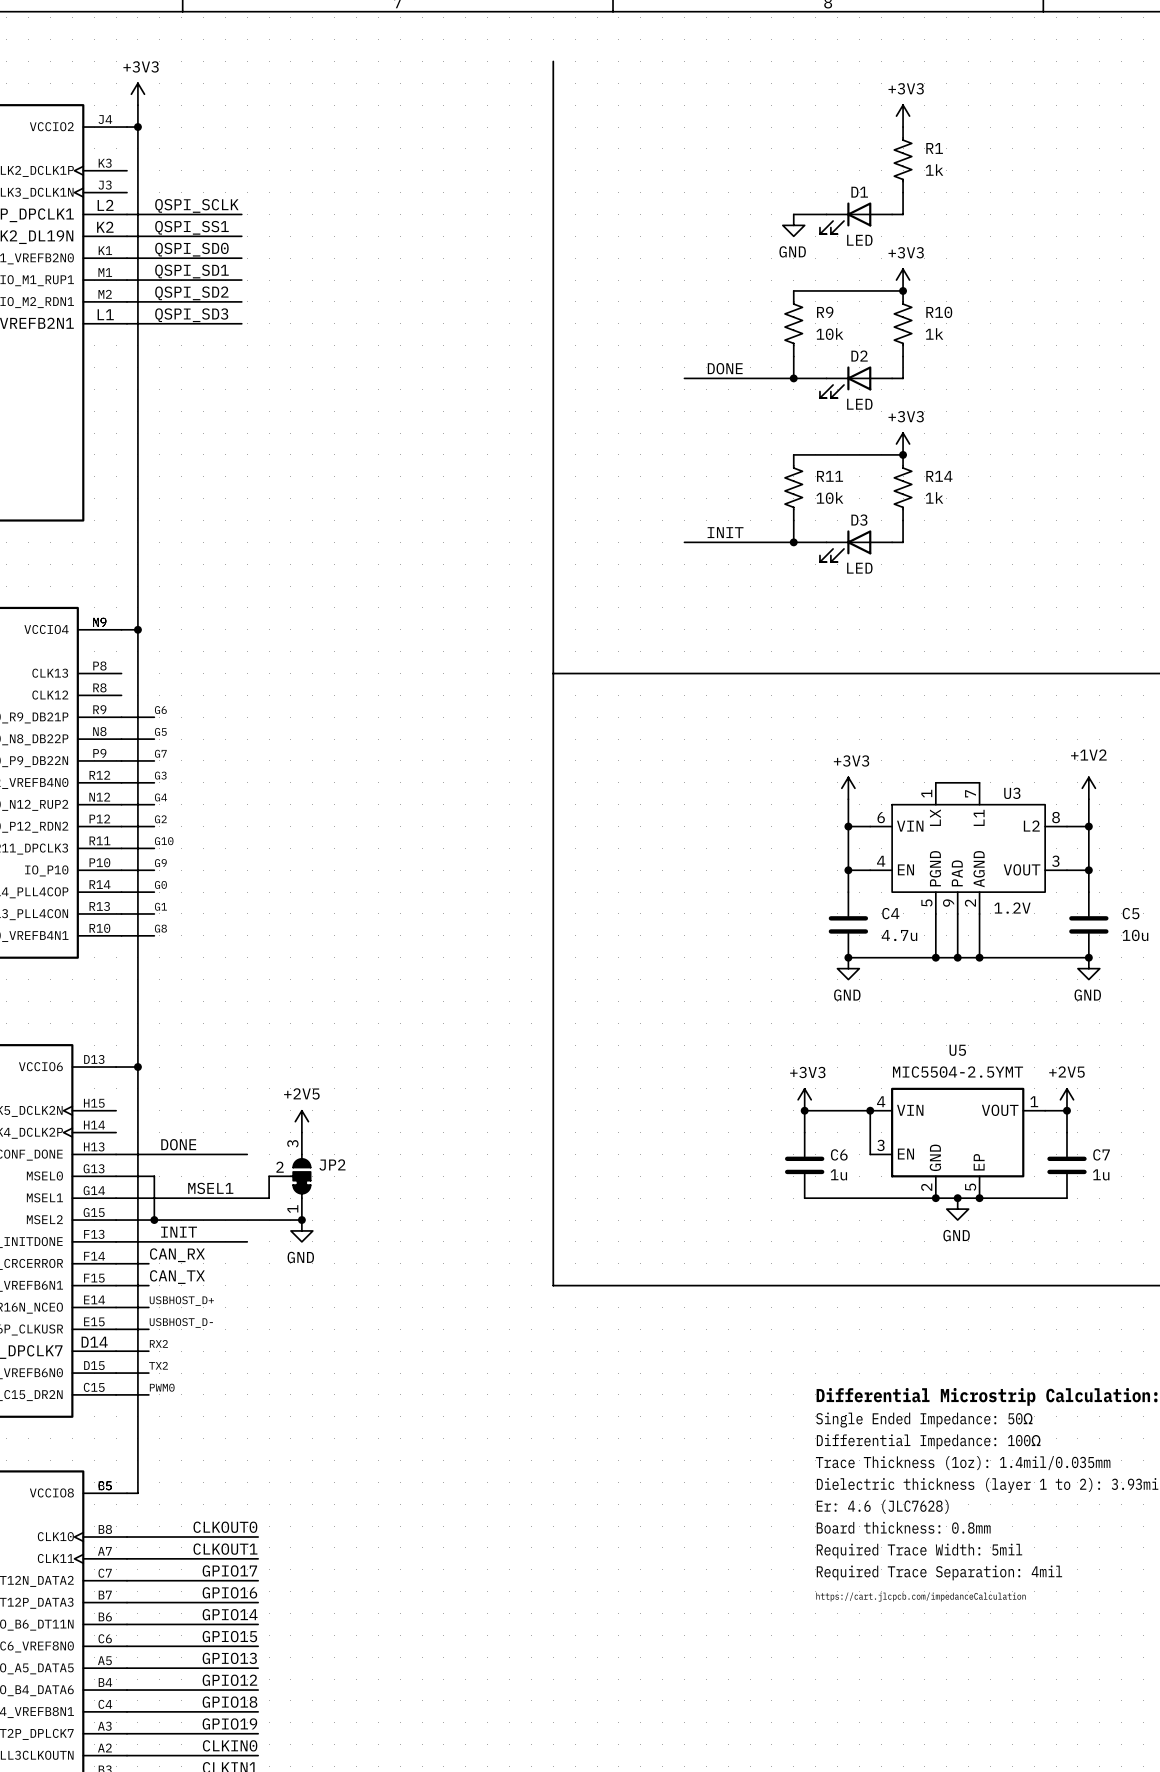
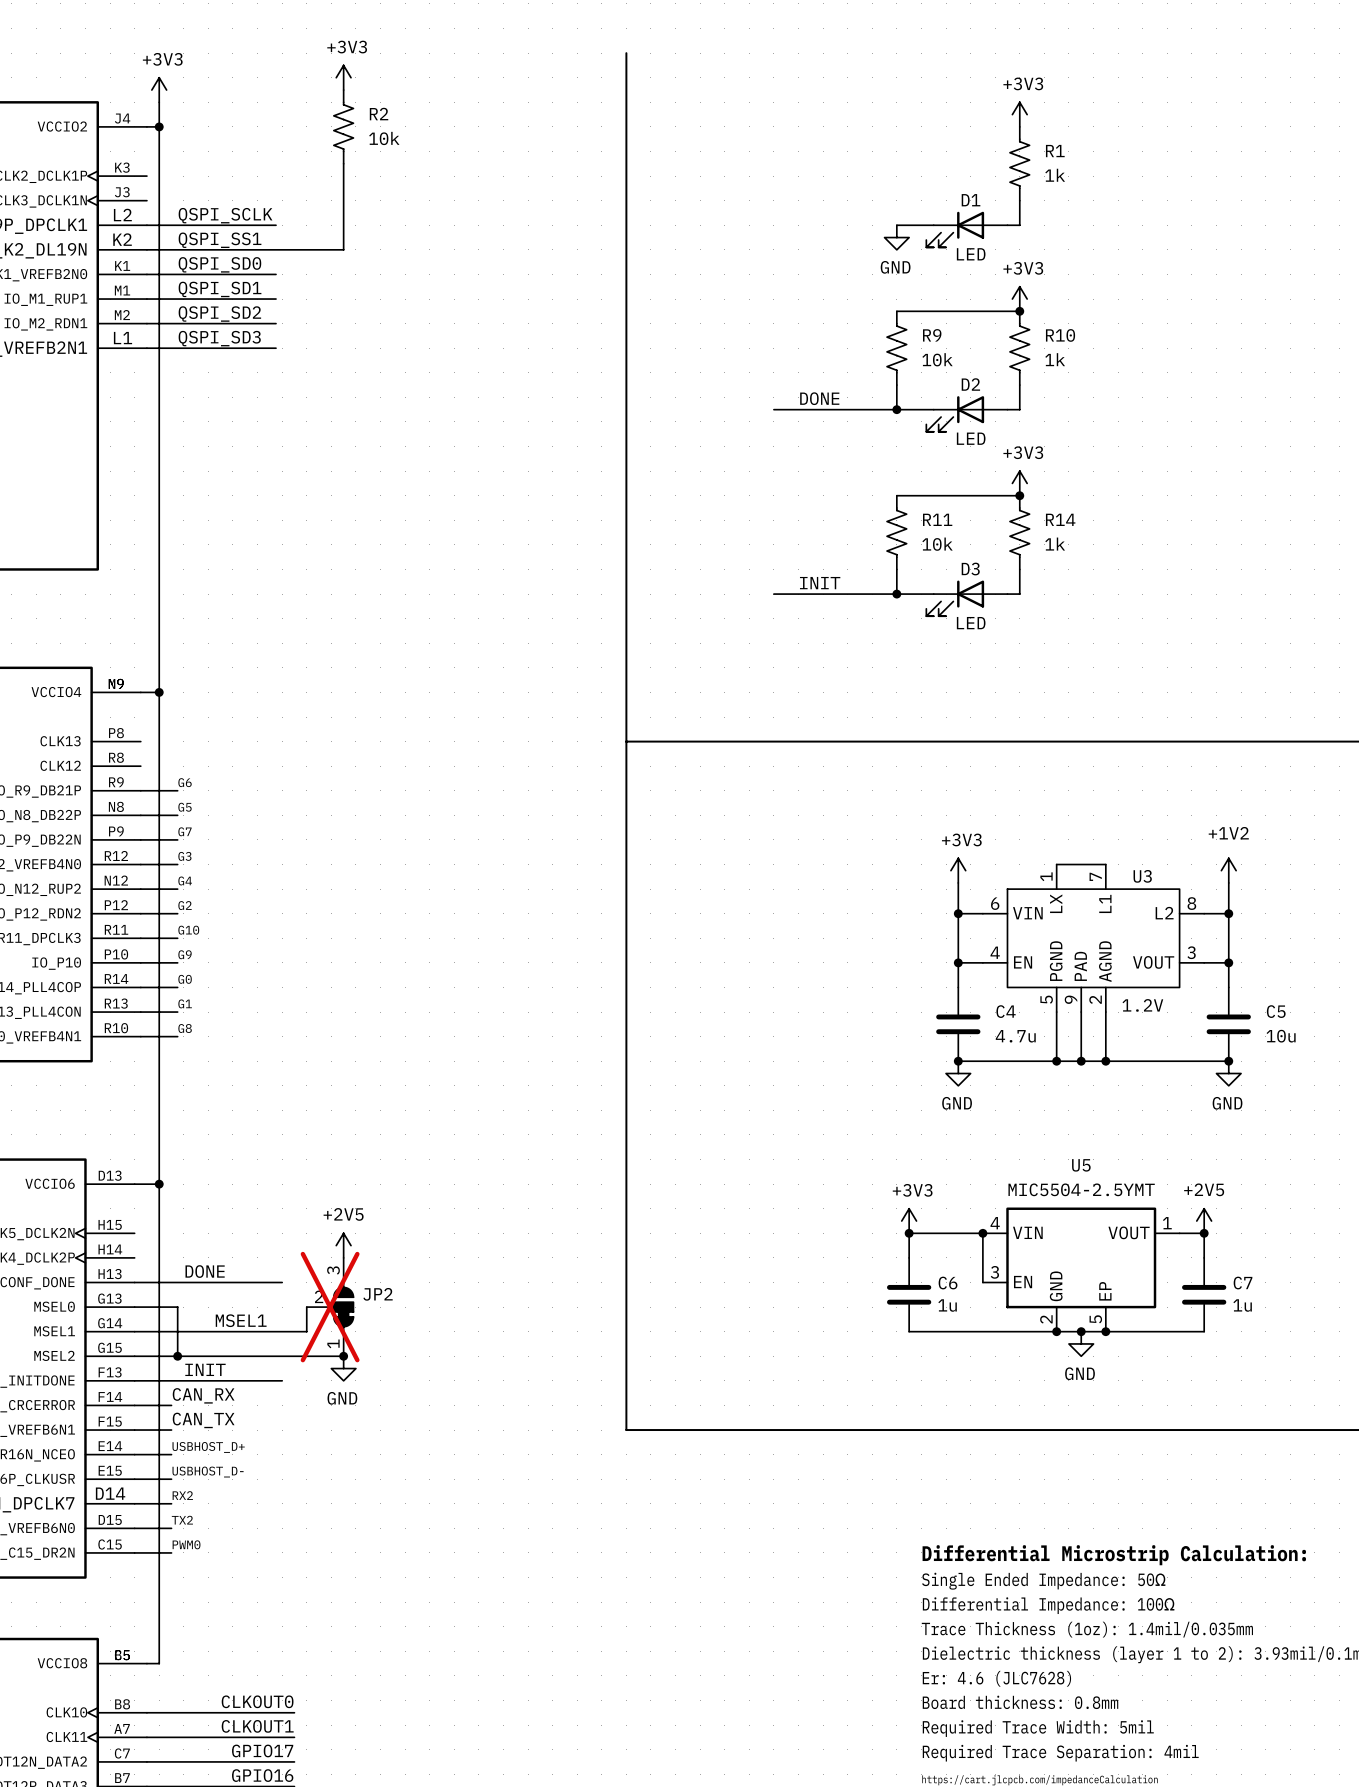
power symbol: none -> +3V3 (343, 77)
R2: none -> 10k (343, 126)
wire: none -> (343, 163) (343, 249) (276, 249)
JP2 do-not-place cross: none -> (330, 1307)

